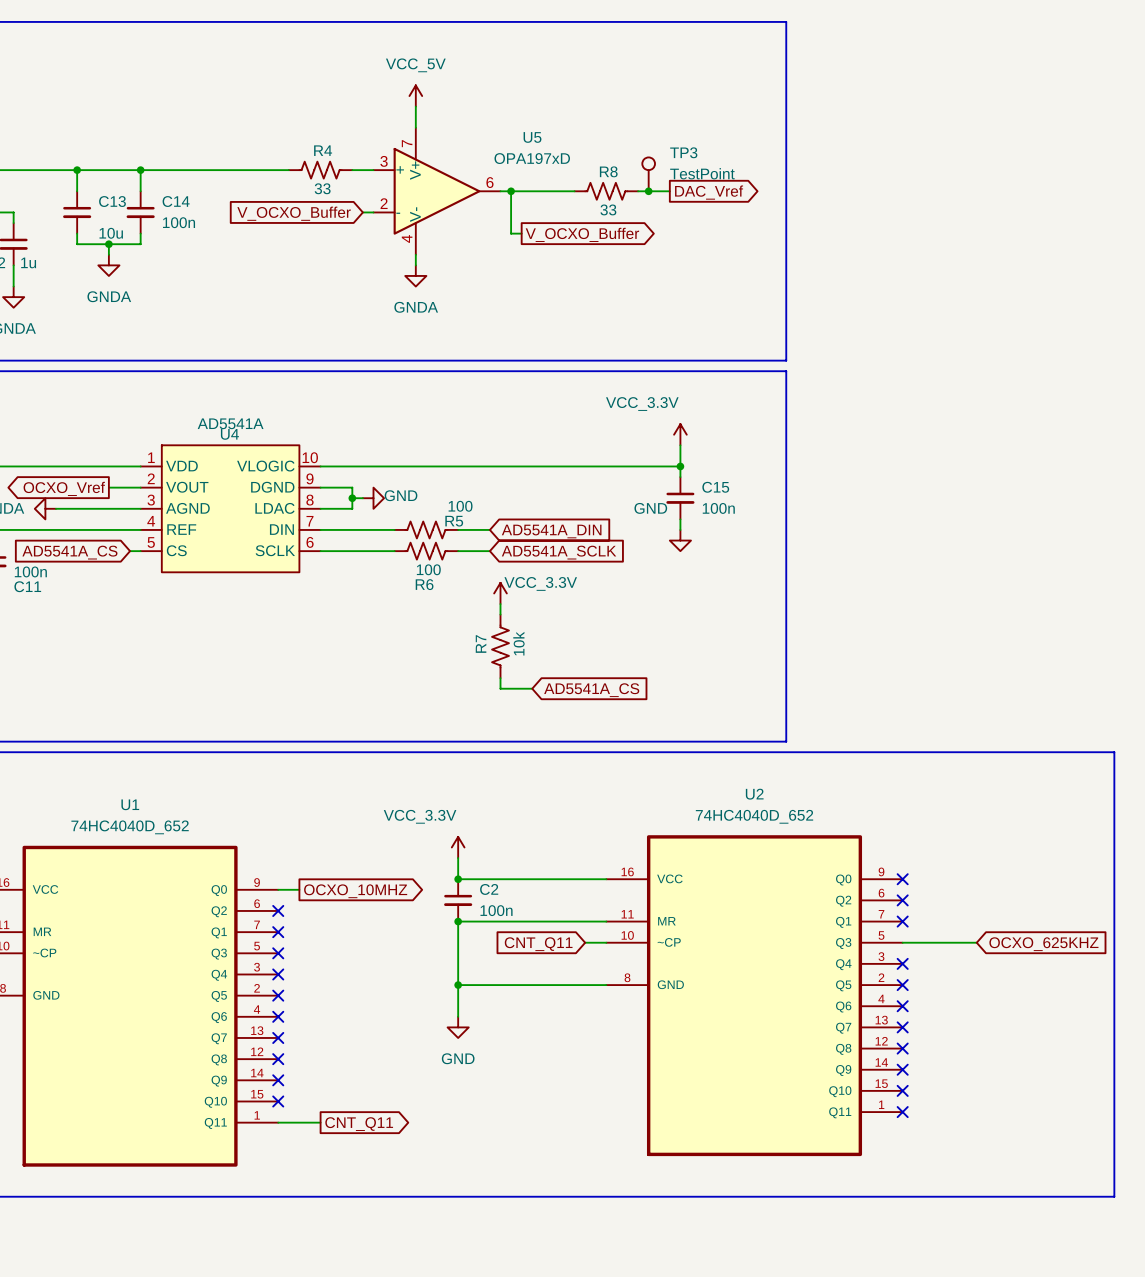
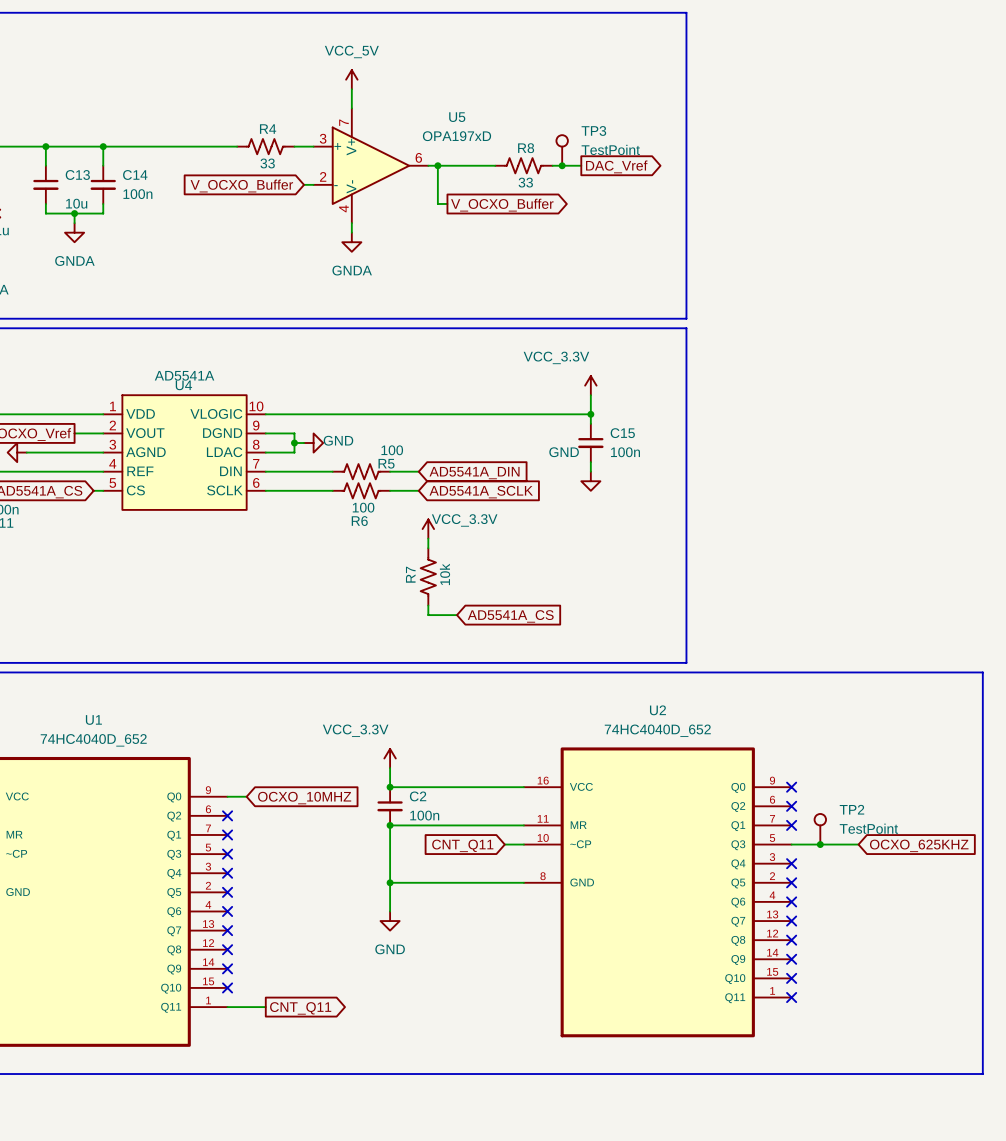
global label shape: output (355, 891) -> input (304, 798)
TP2: none -> TestPoint (820, 829)
junction: none -> (820, 844)

